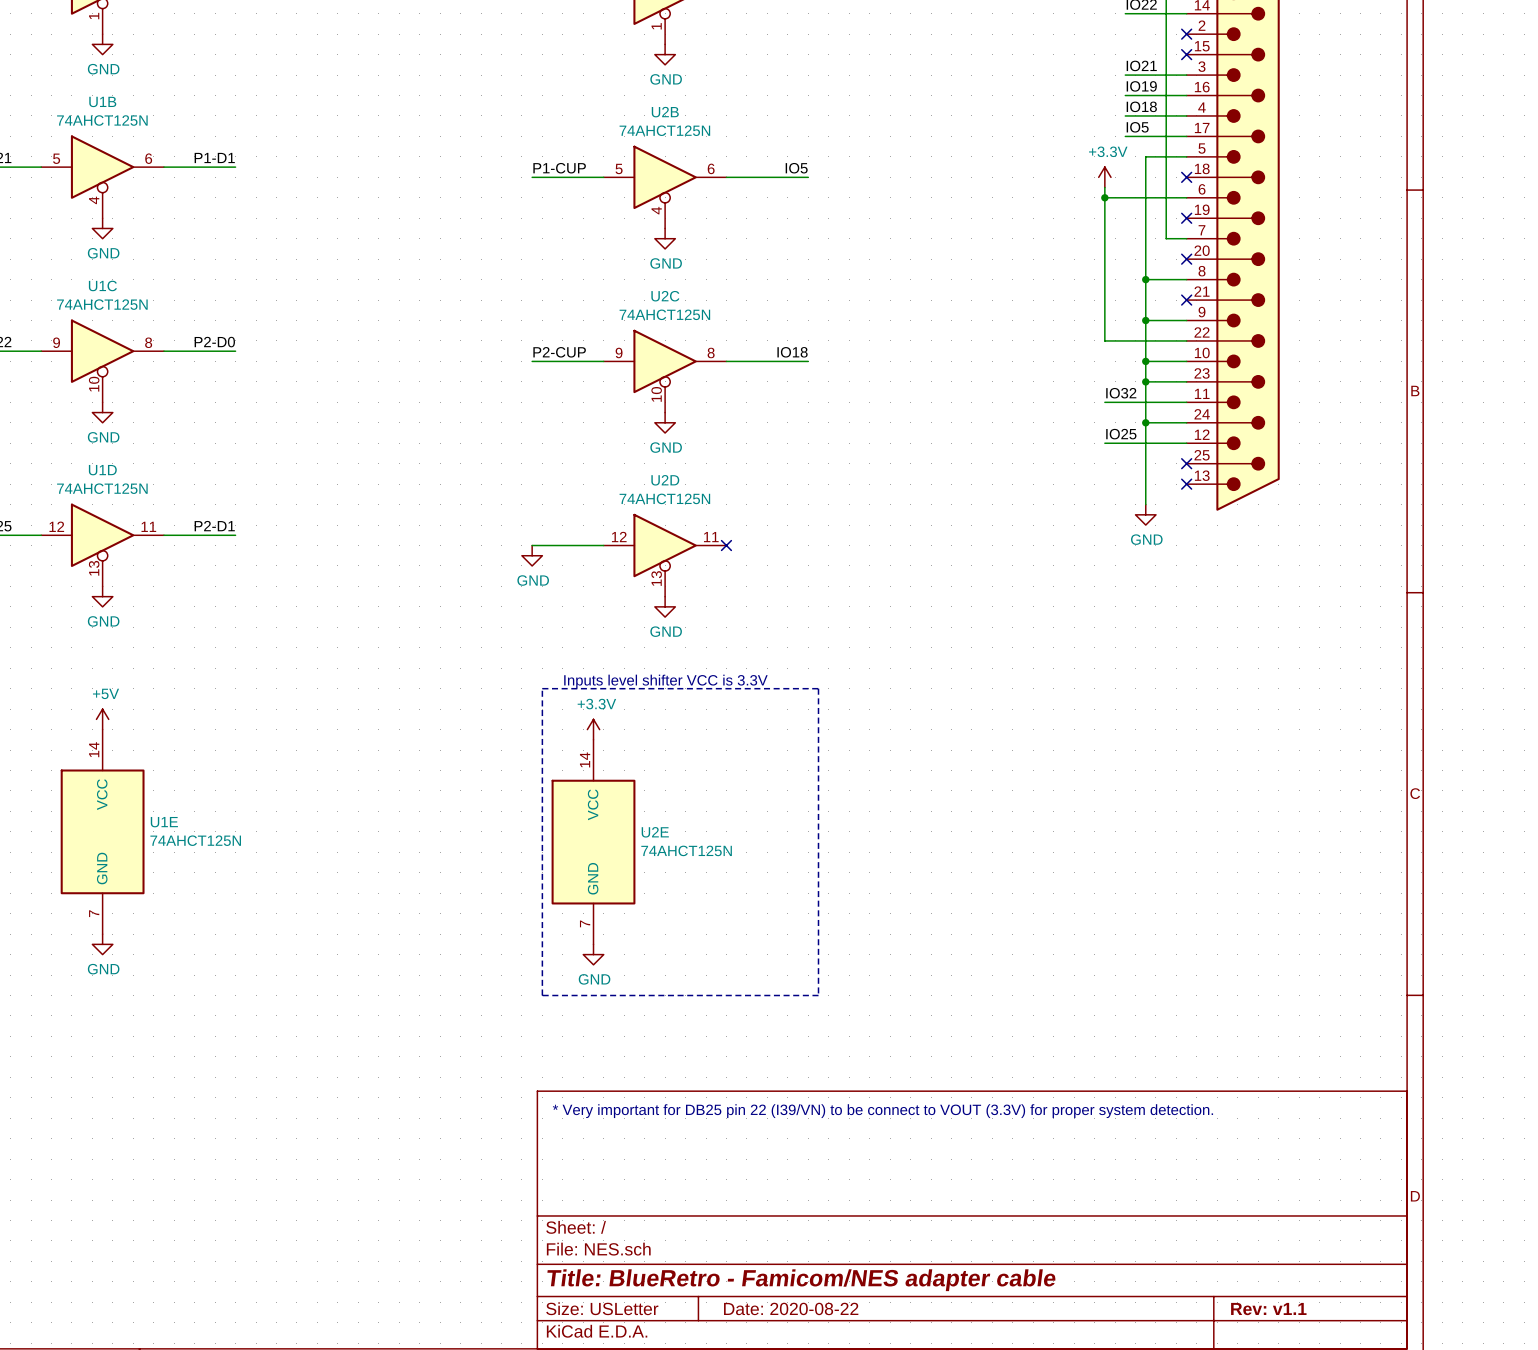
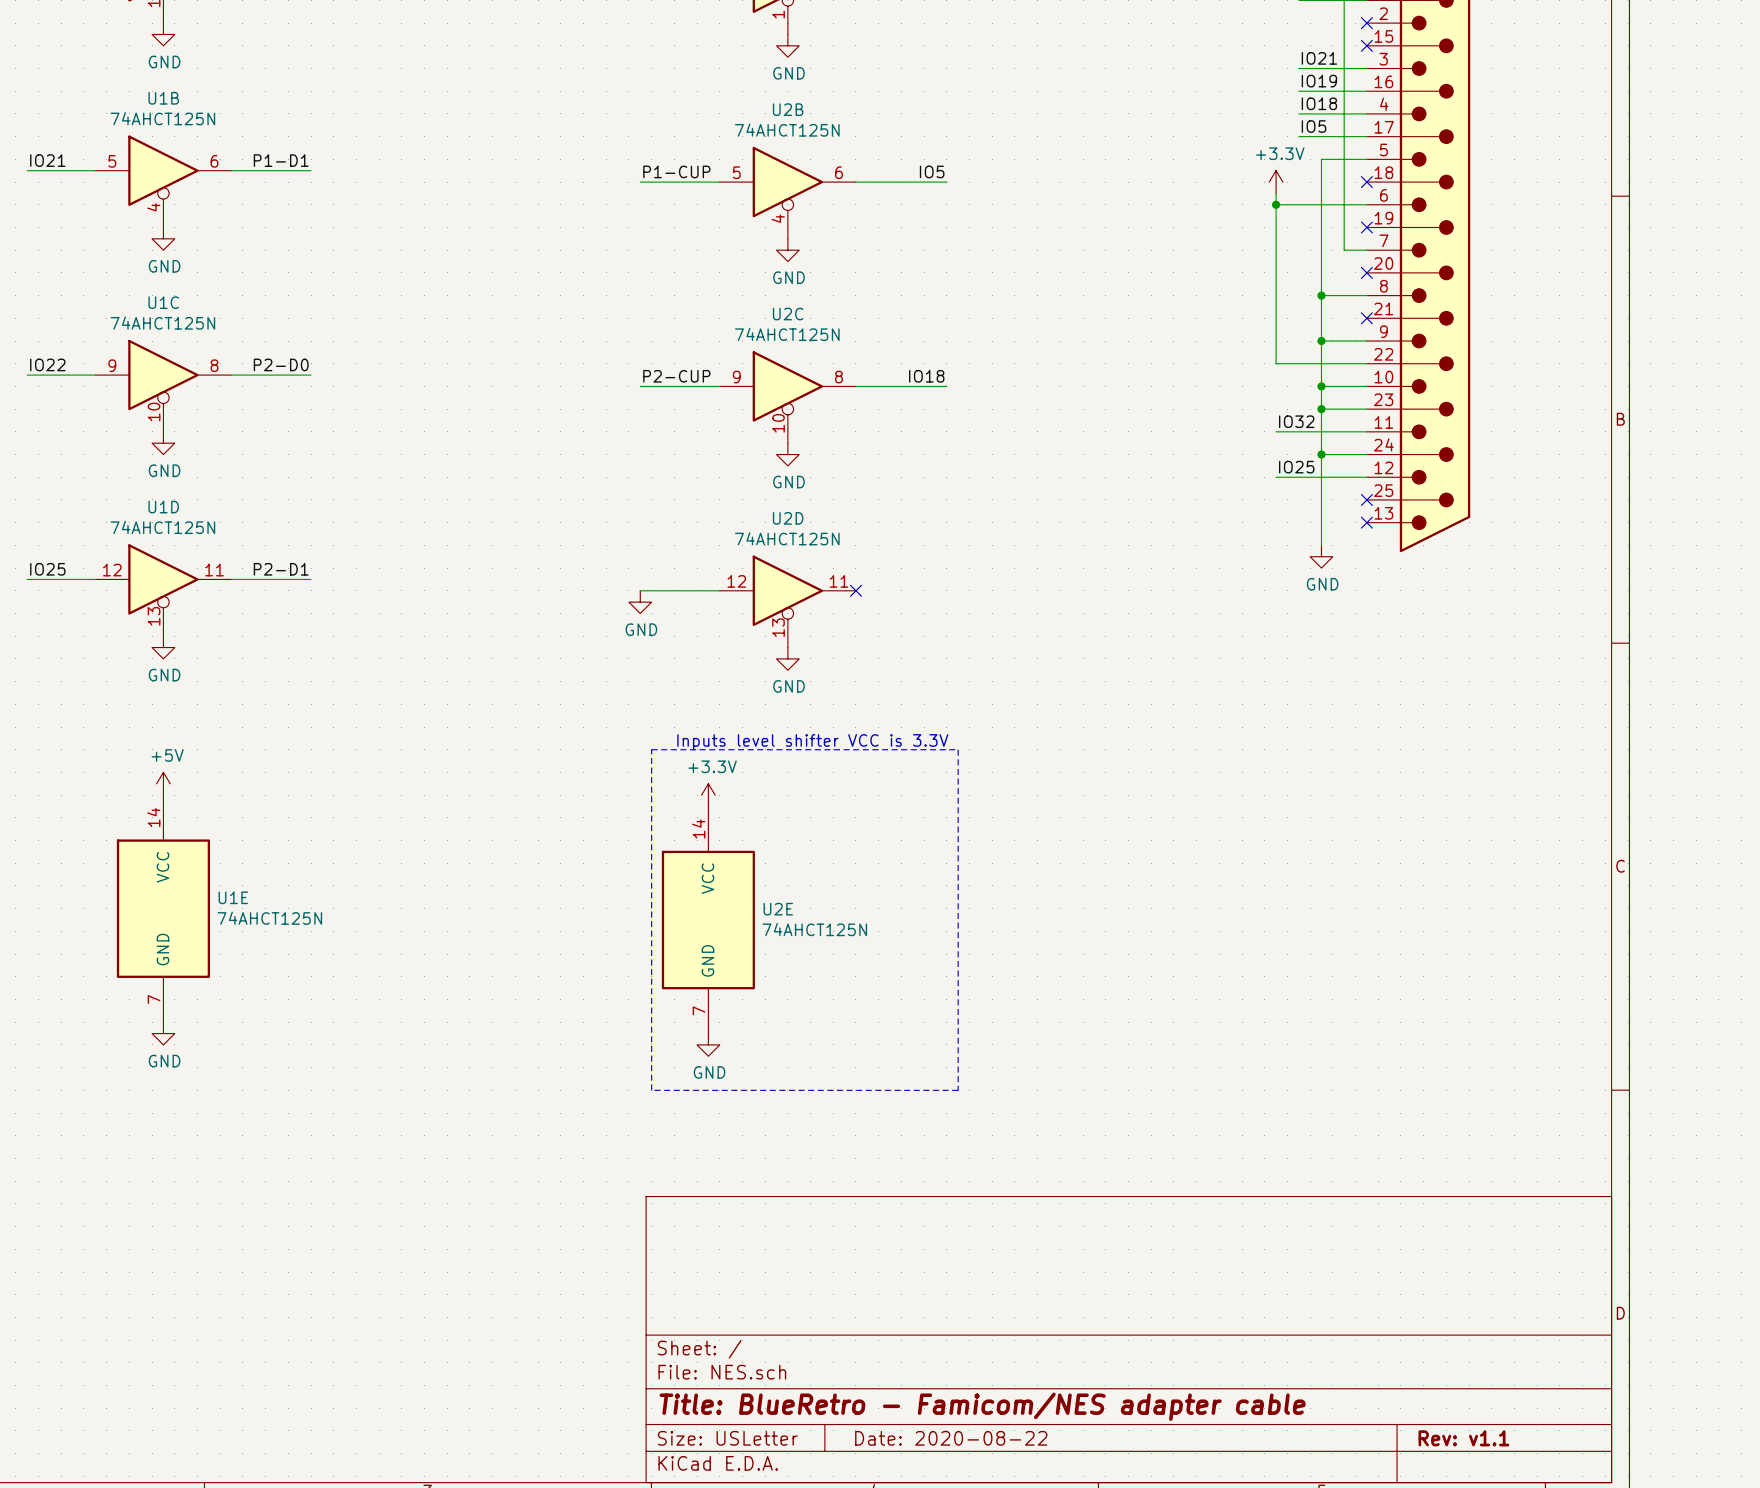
text: * Very important for DB25 pin 22 (I39/VN) to be connect to VOUT (3.3V) for proper system detection. (882, 1111) -> none

